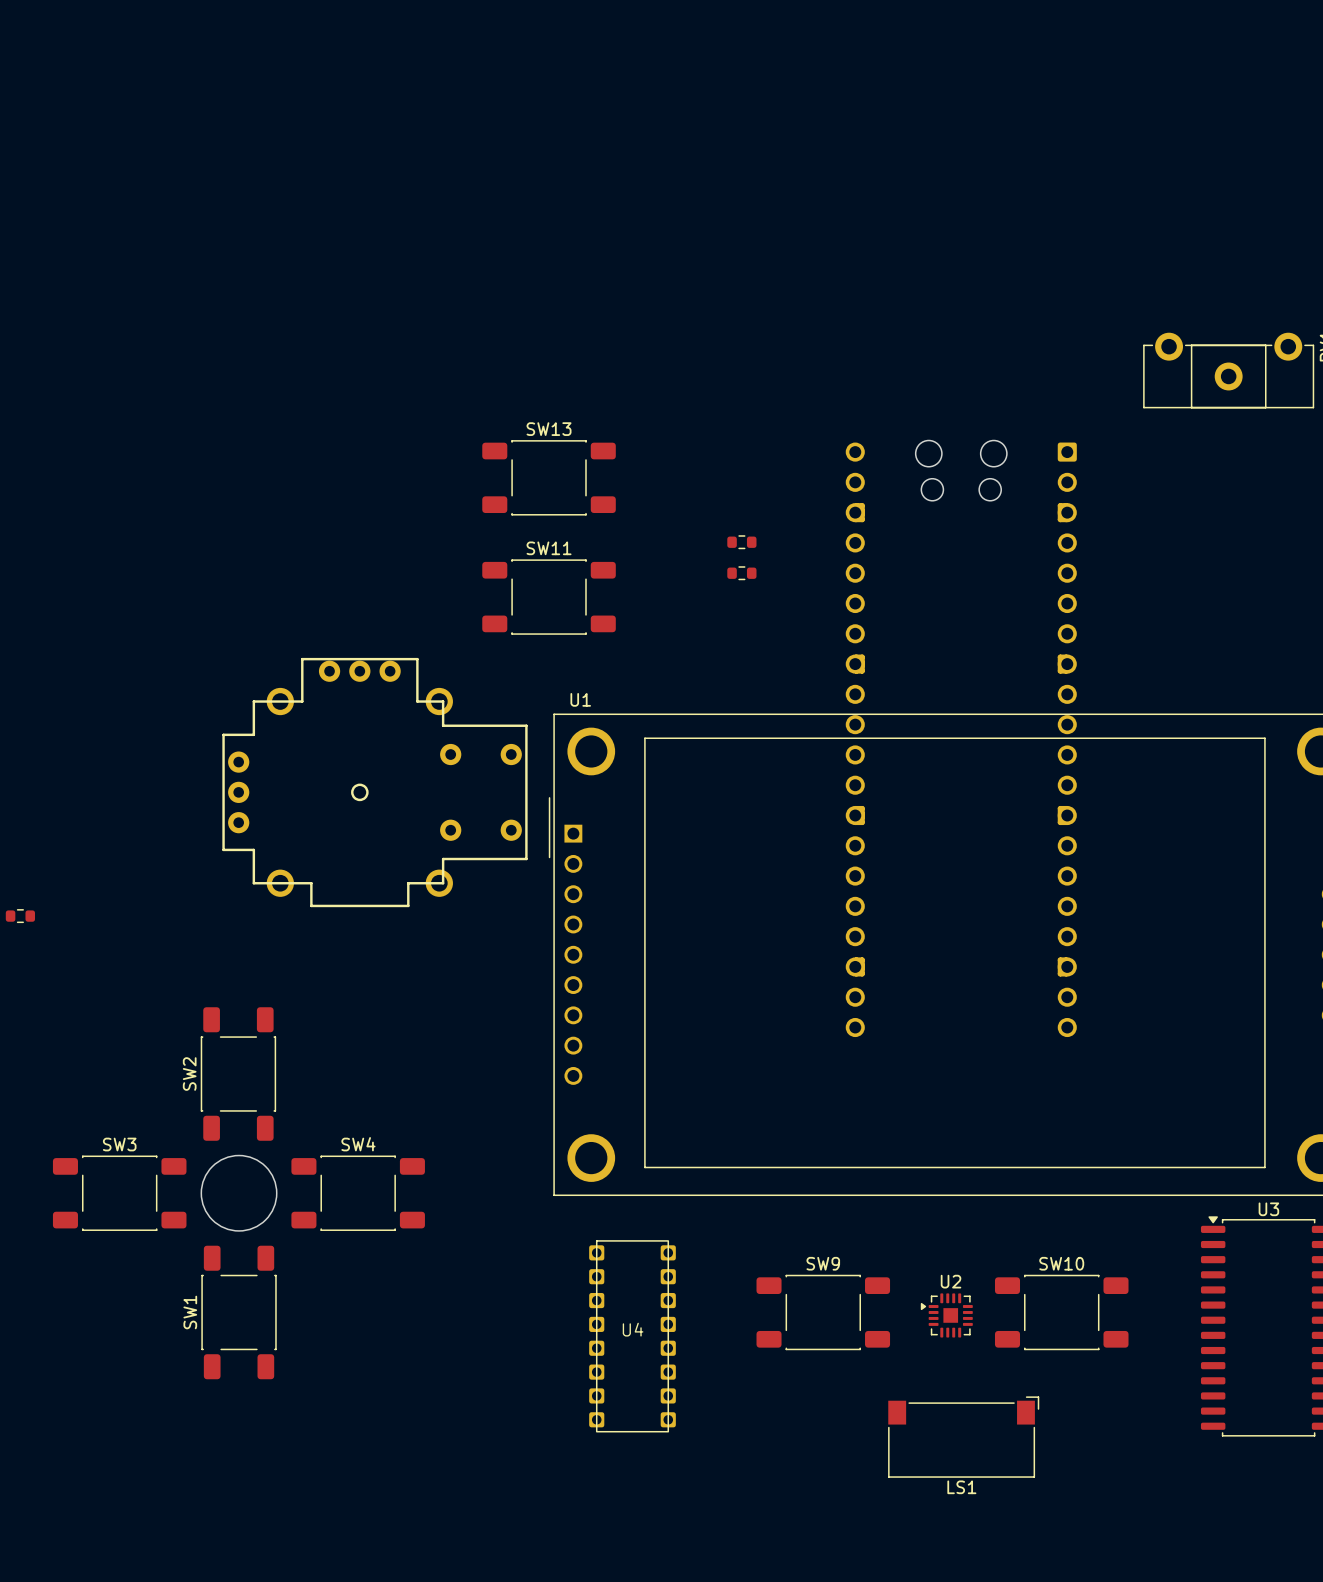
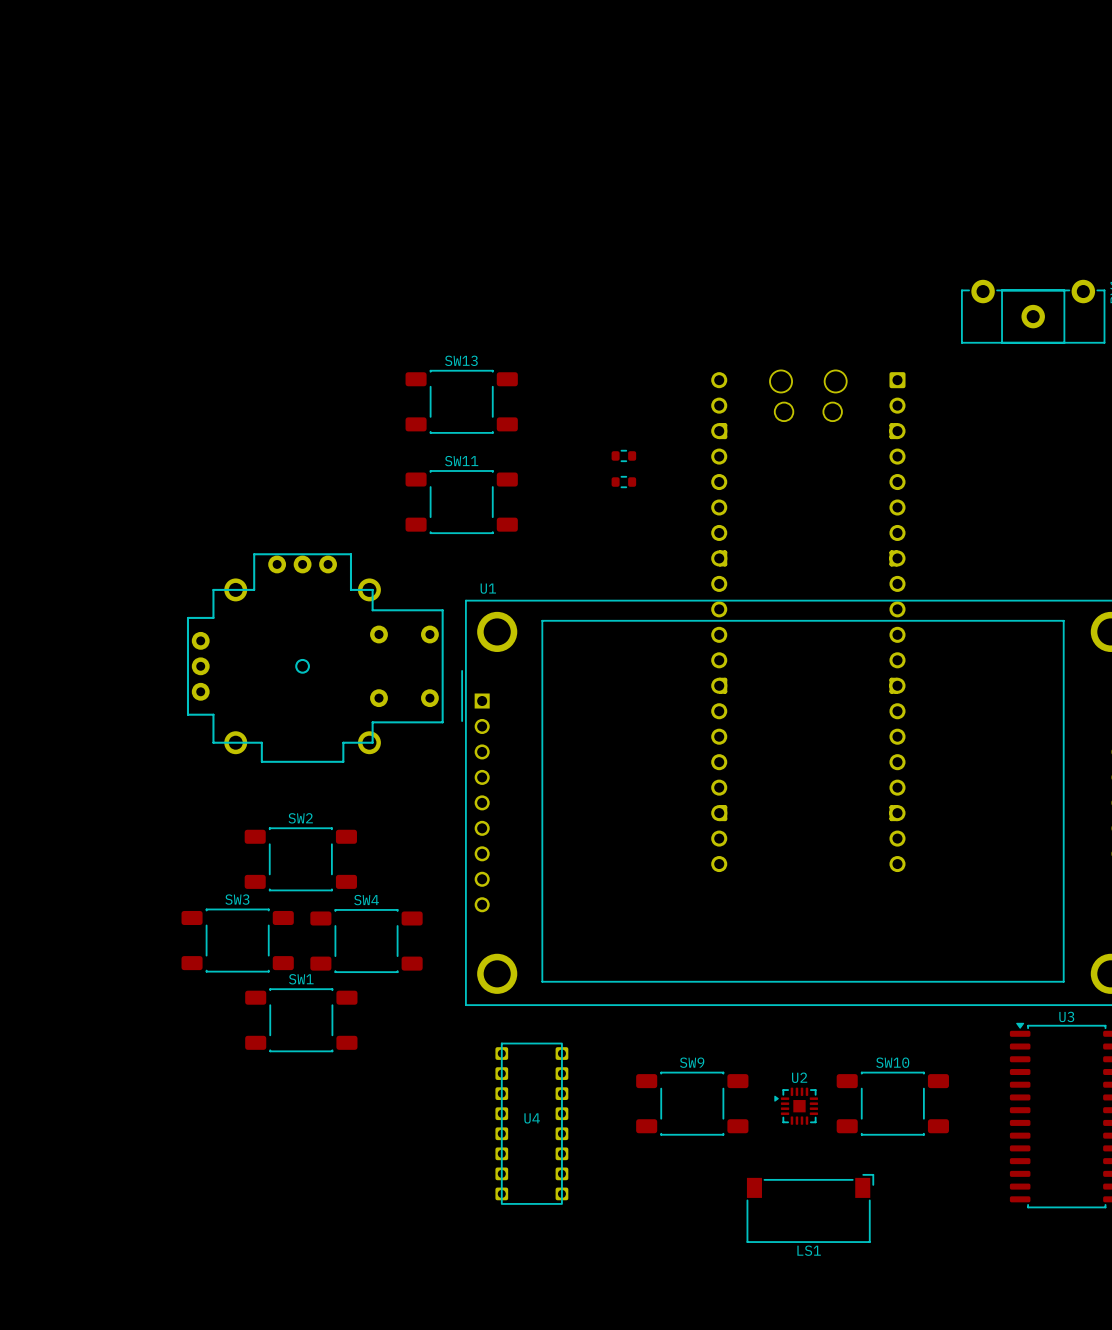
part: (20, 916) -> none
SW2 rotation: 0° (238, 1074) -> 90° clockwise (300, 859)
SW2 position: (238, 1074) -> (300, 859)
round board edge: [201, 1155, 278, 1232] -> none
SW3 position: (119, 1193) -> (237, 940)
SW4 position: (358, 1193) -> (366, 941)
SW1 rotation: 0° (239, 1312) -> 90° clockwise (301, 1020)
SW1 position: (239, 1312) -> (301, 1020)

